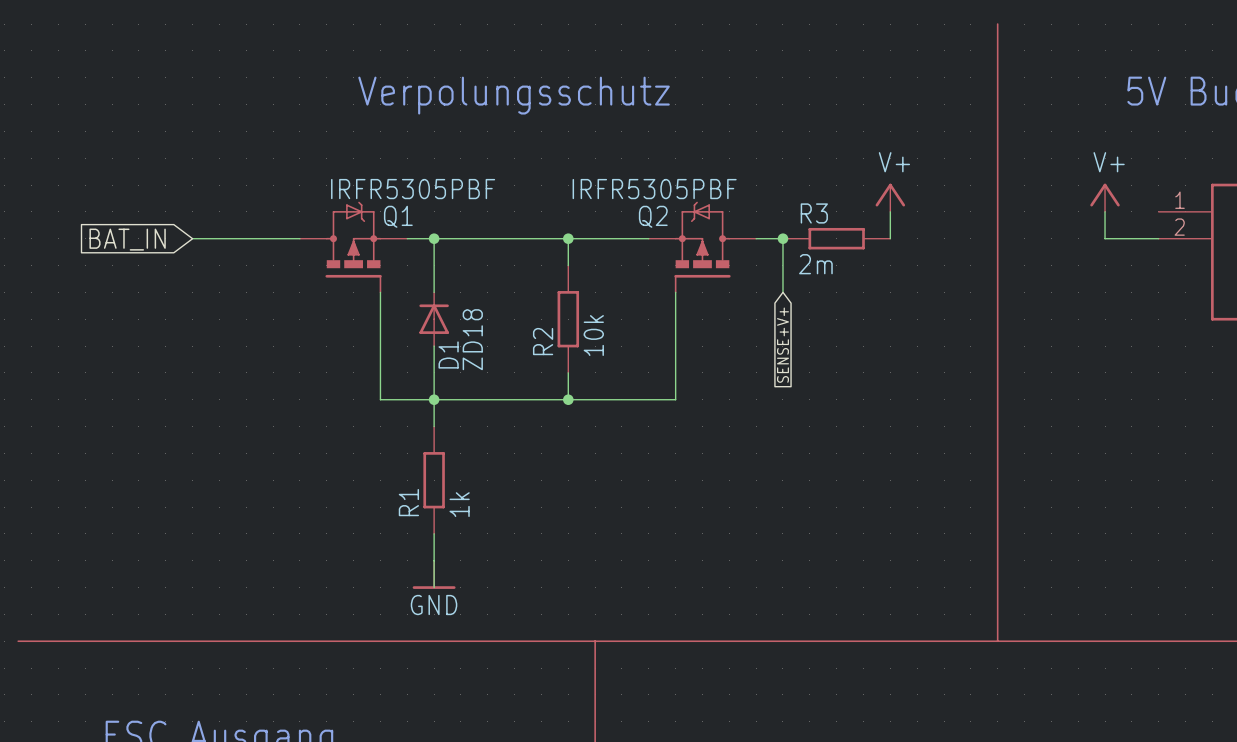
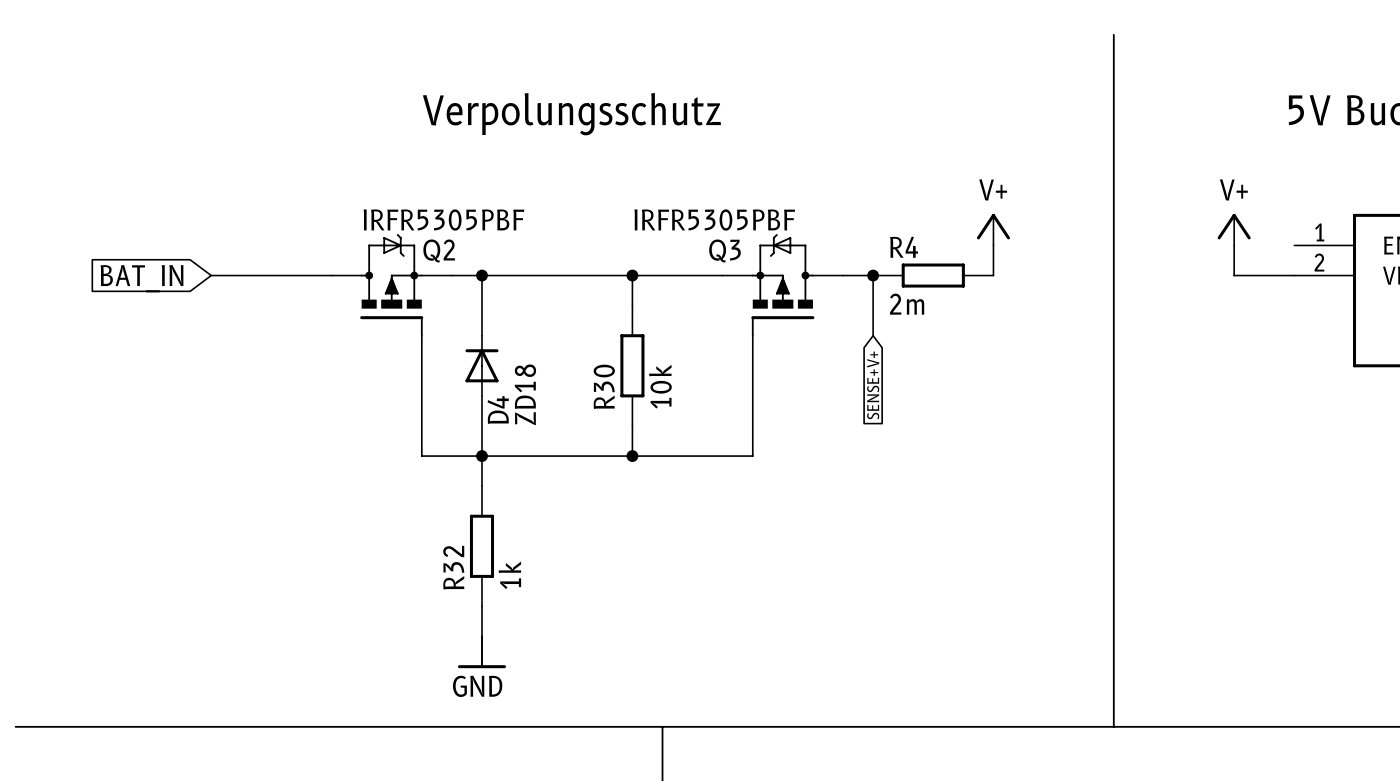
R3 name: R3 (814, 213) -> R4 (904, 247)
Q1 name: Q1 (398, 216) -> Q2 (439, 250)
Q2 name: Q2 (653, 216) -> Q3 (724, 250)
R2 name: R2 (543, 341) -> R30 (604, 386)
D1 name: D1 (448, 354) -> D4 (498, 409)
R1 name: R1 (408, 502) -> R32 (453, 567)

